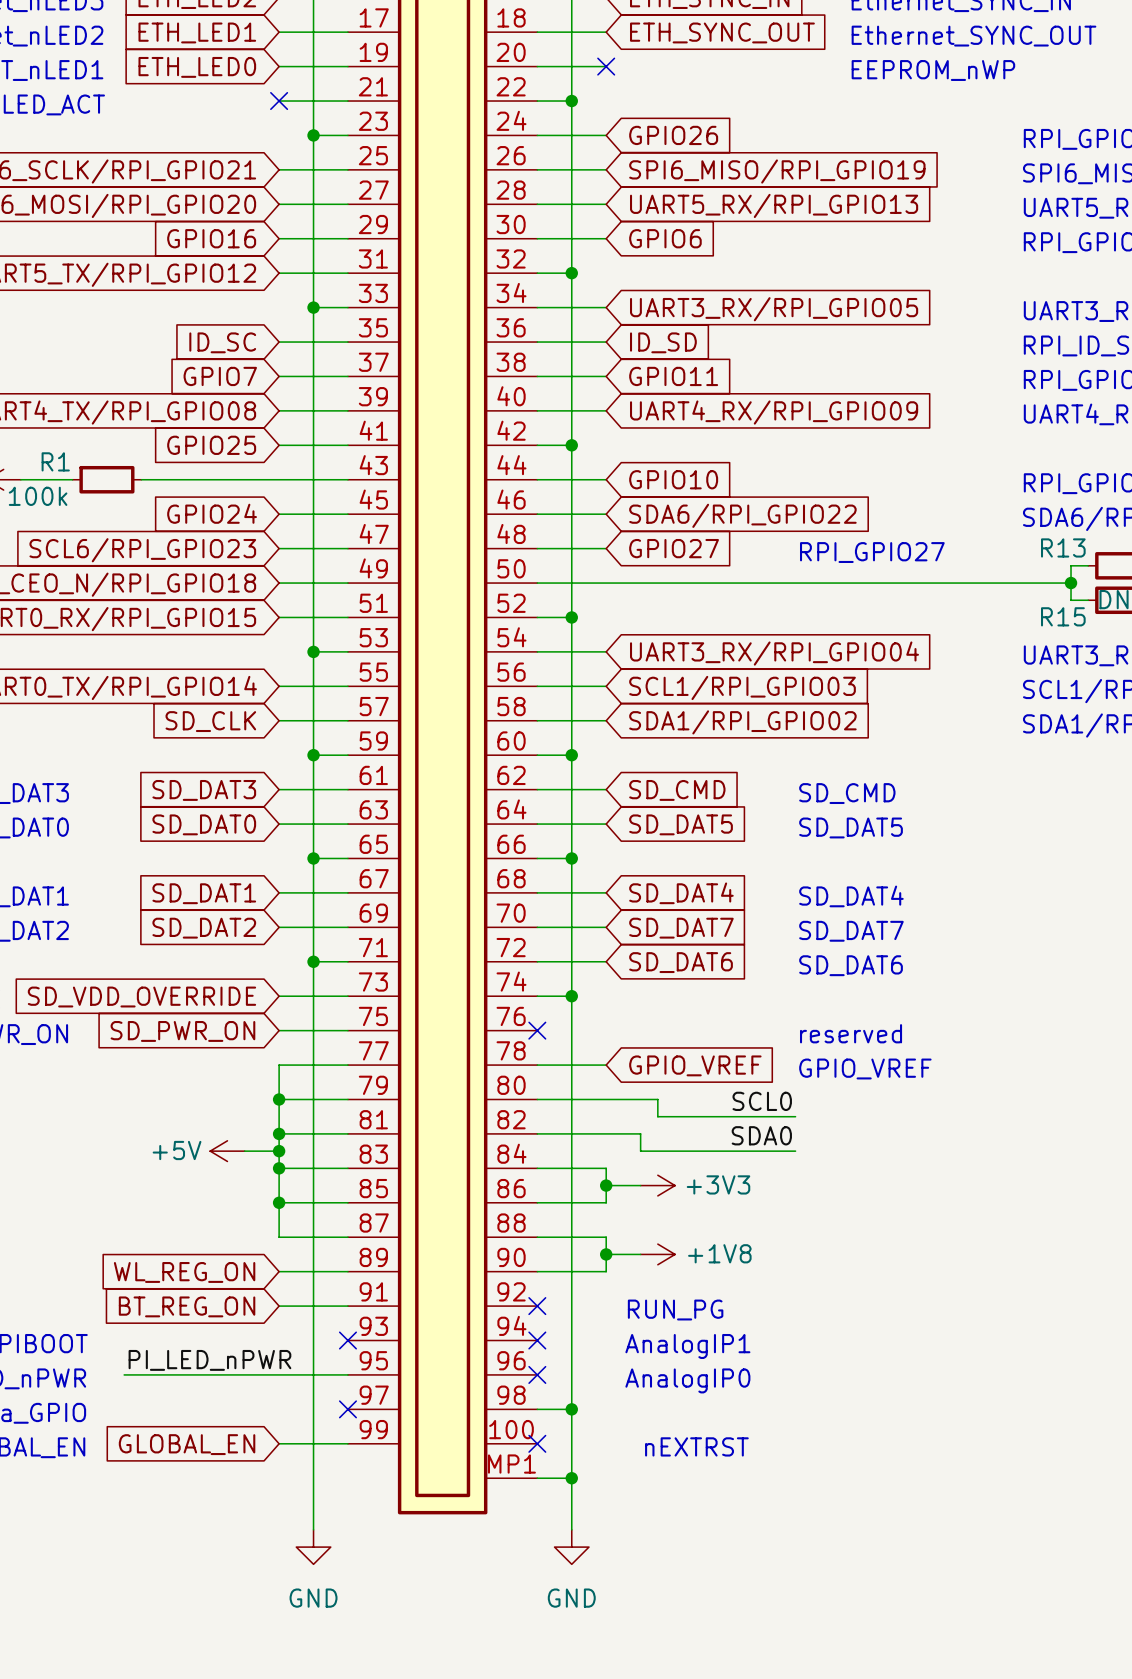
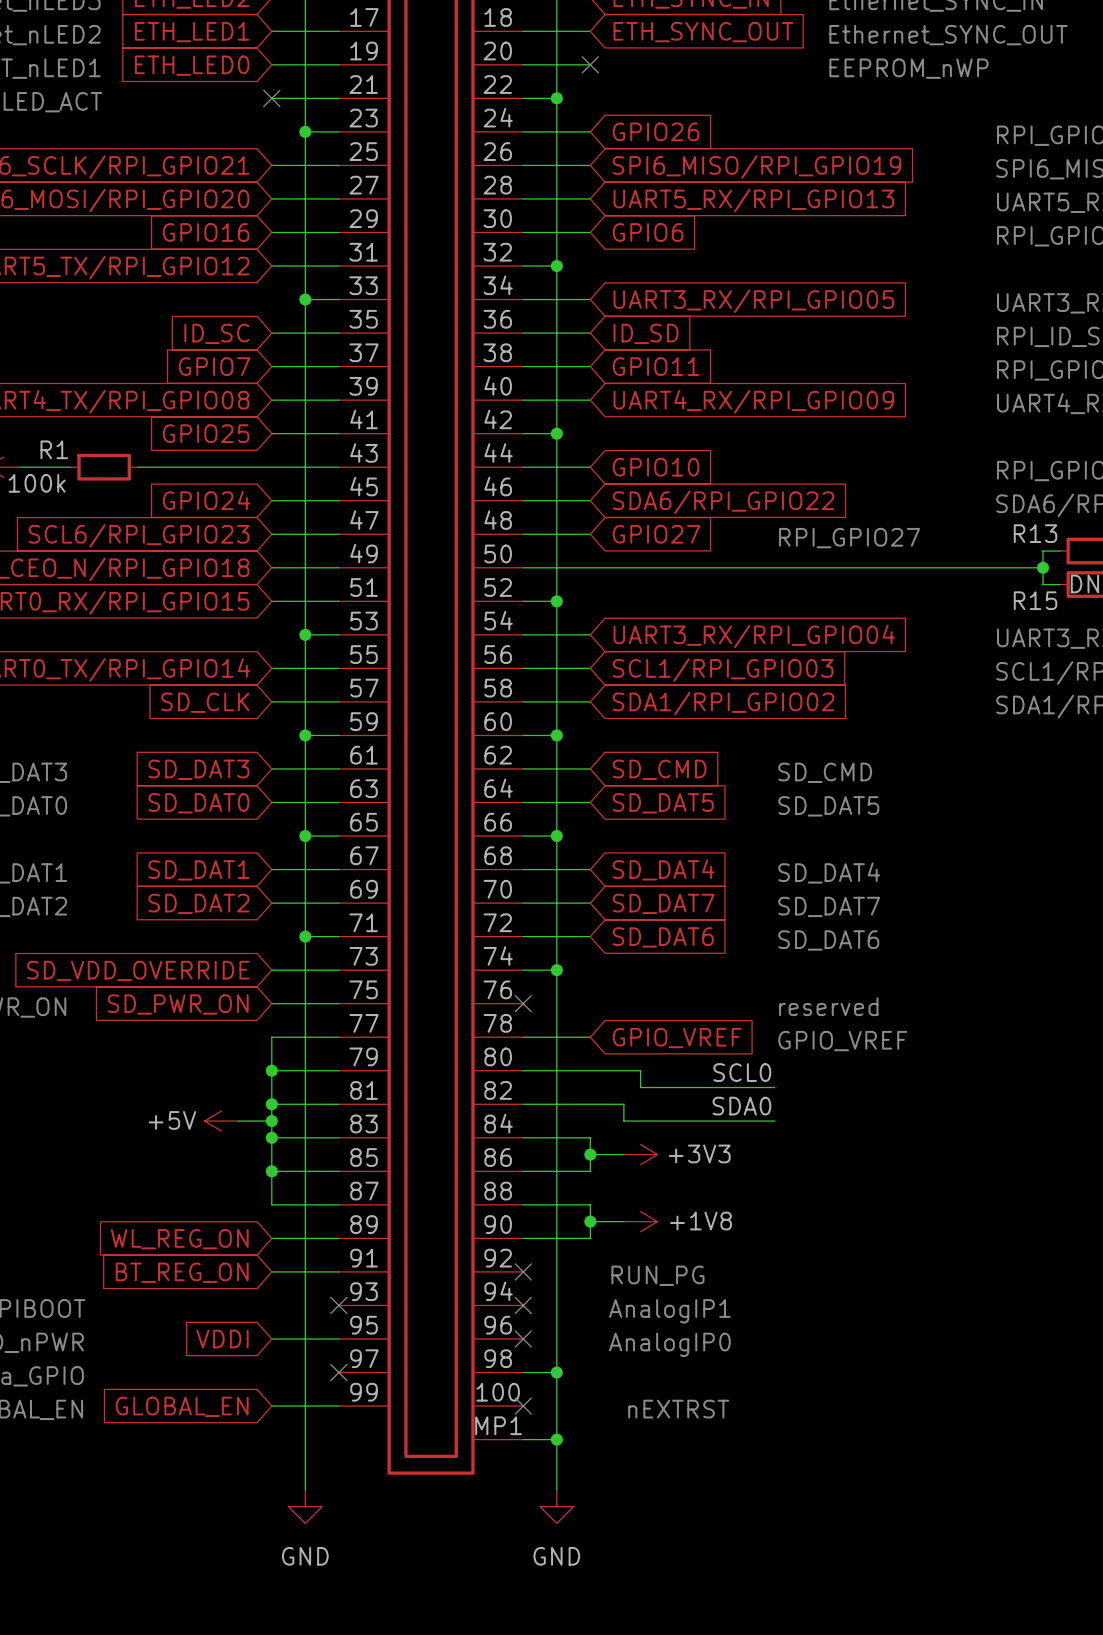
label: PI_LED_nPWR (209, 1360) -> none
wire: (124, 1374) (279, 1374) -> none
global label: none -> VDDI (222, 1338)

